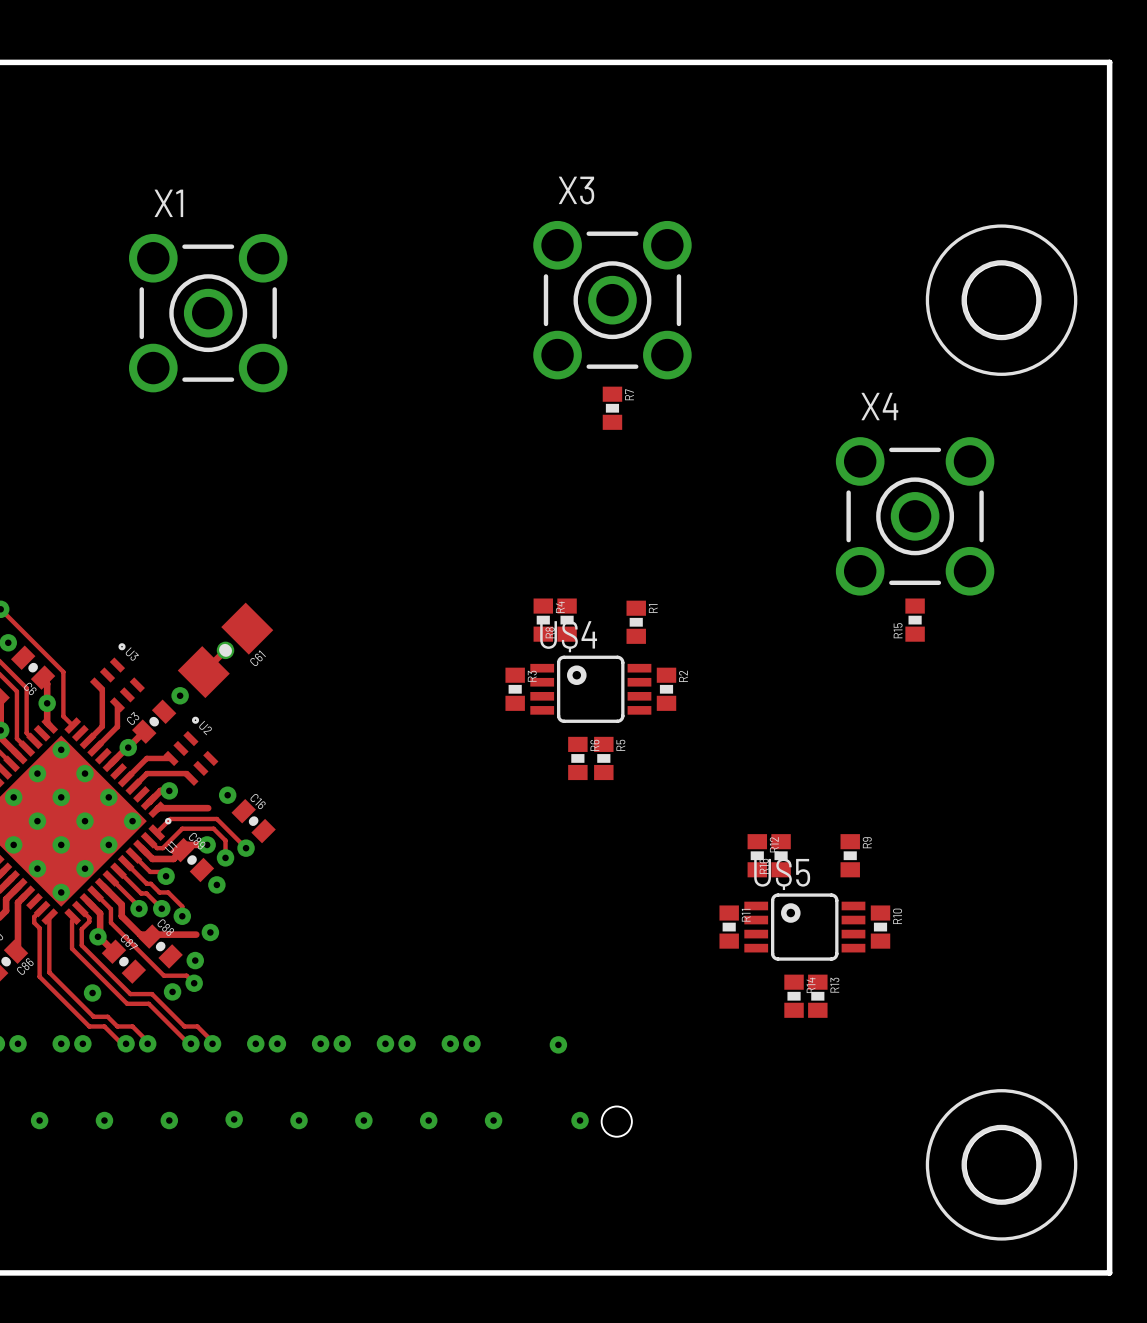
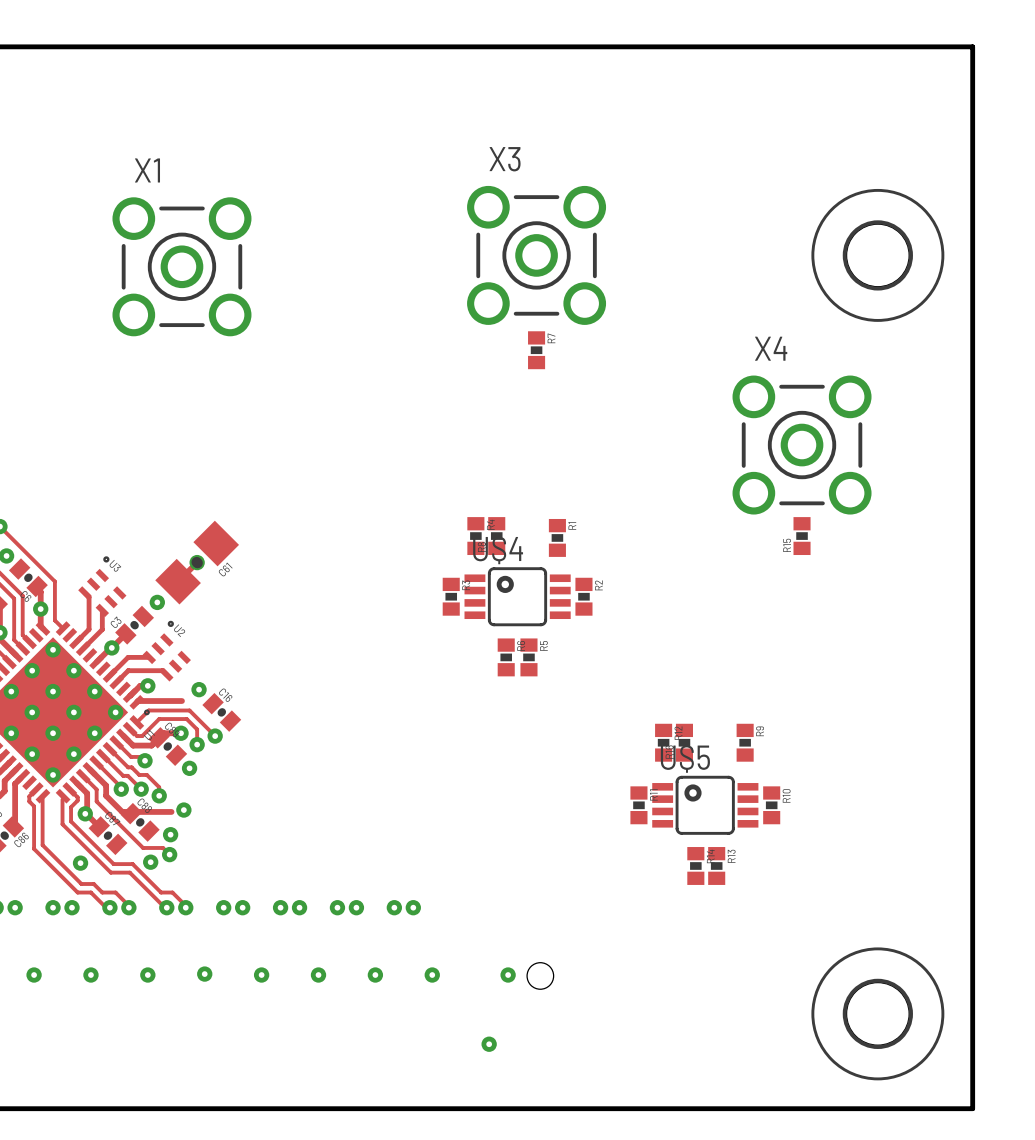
via: (558, 1044) -> none
via: none -> (489, 1044)

